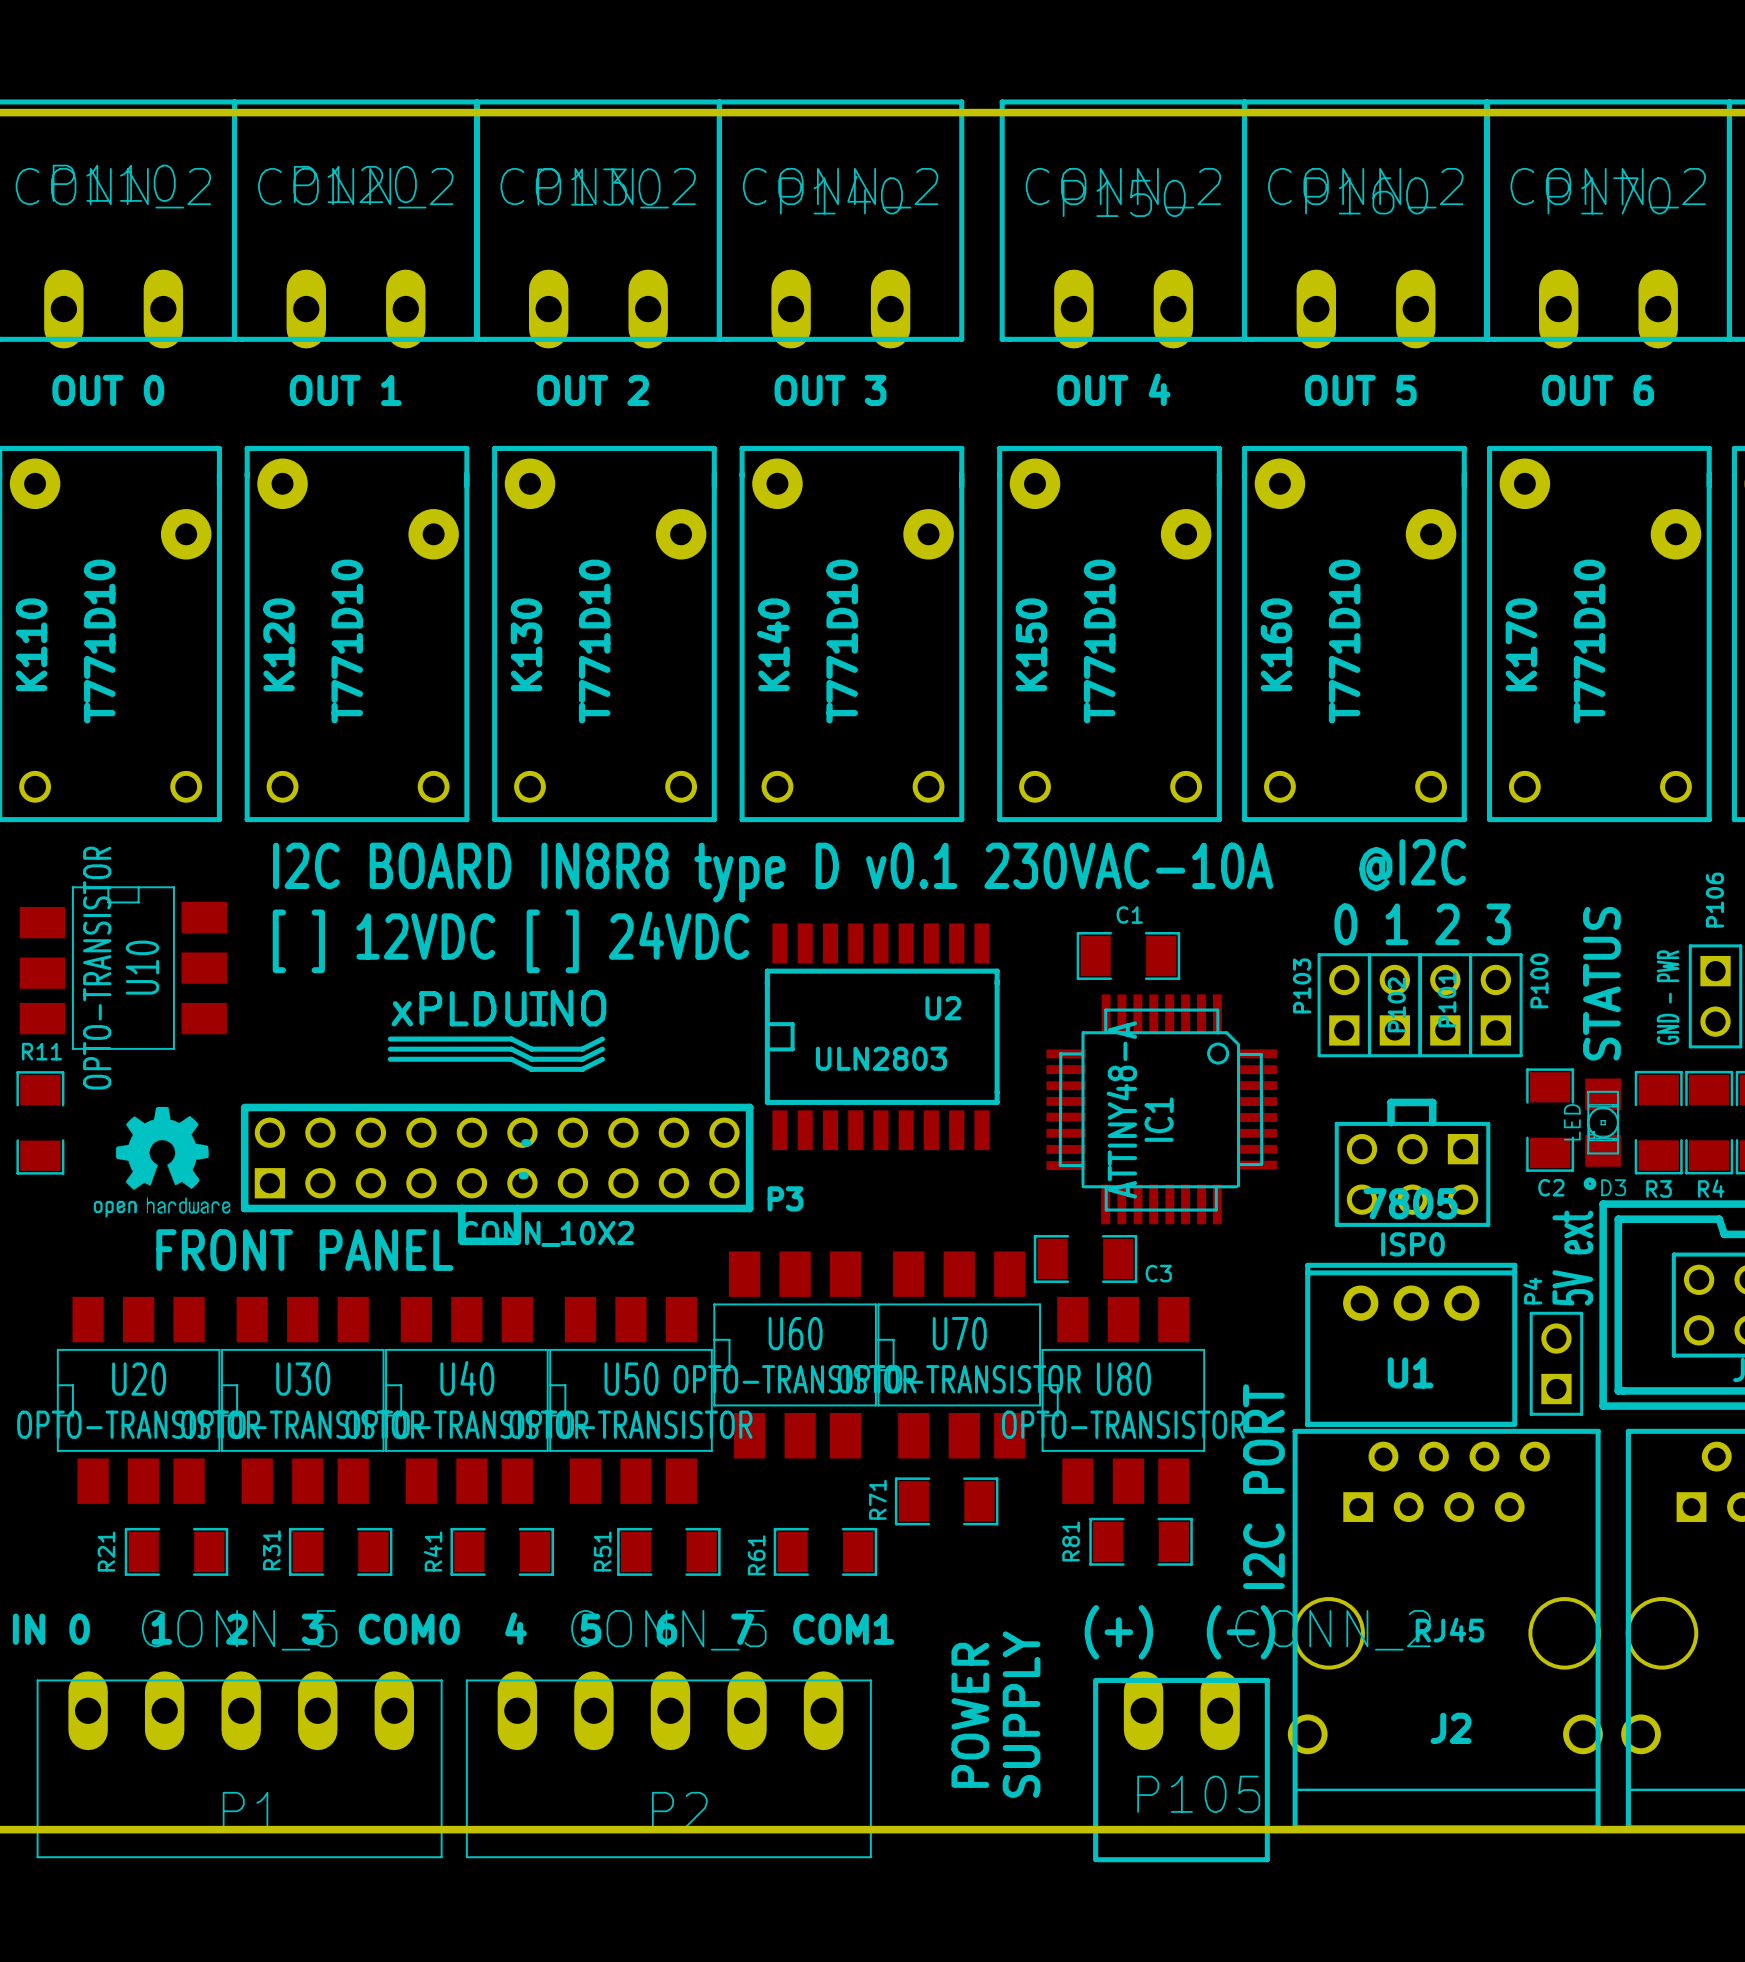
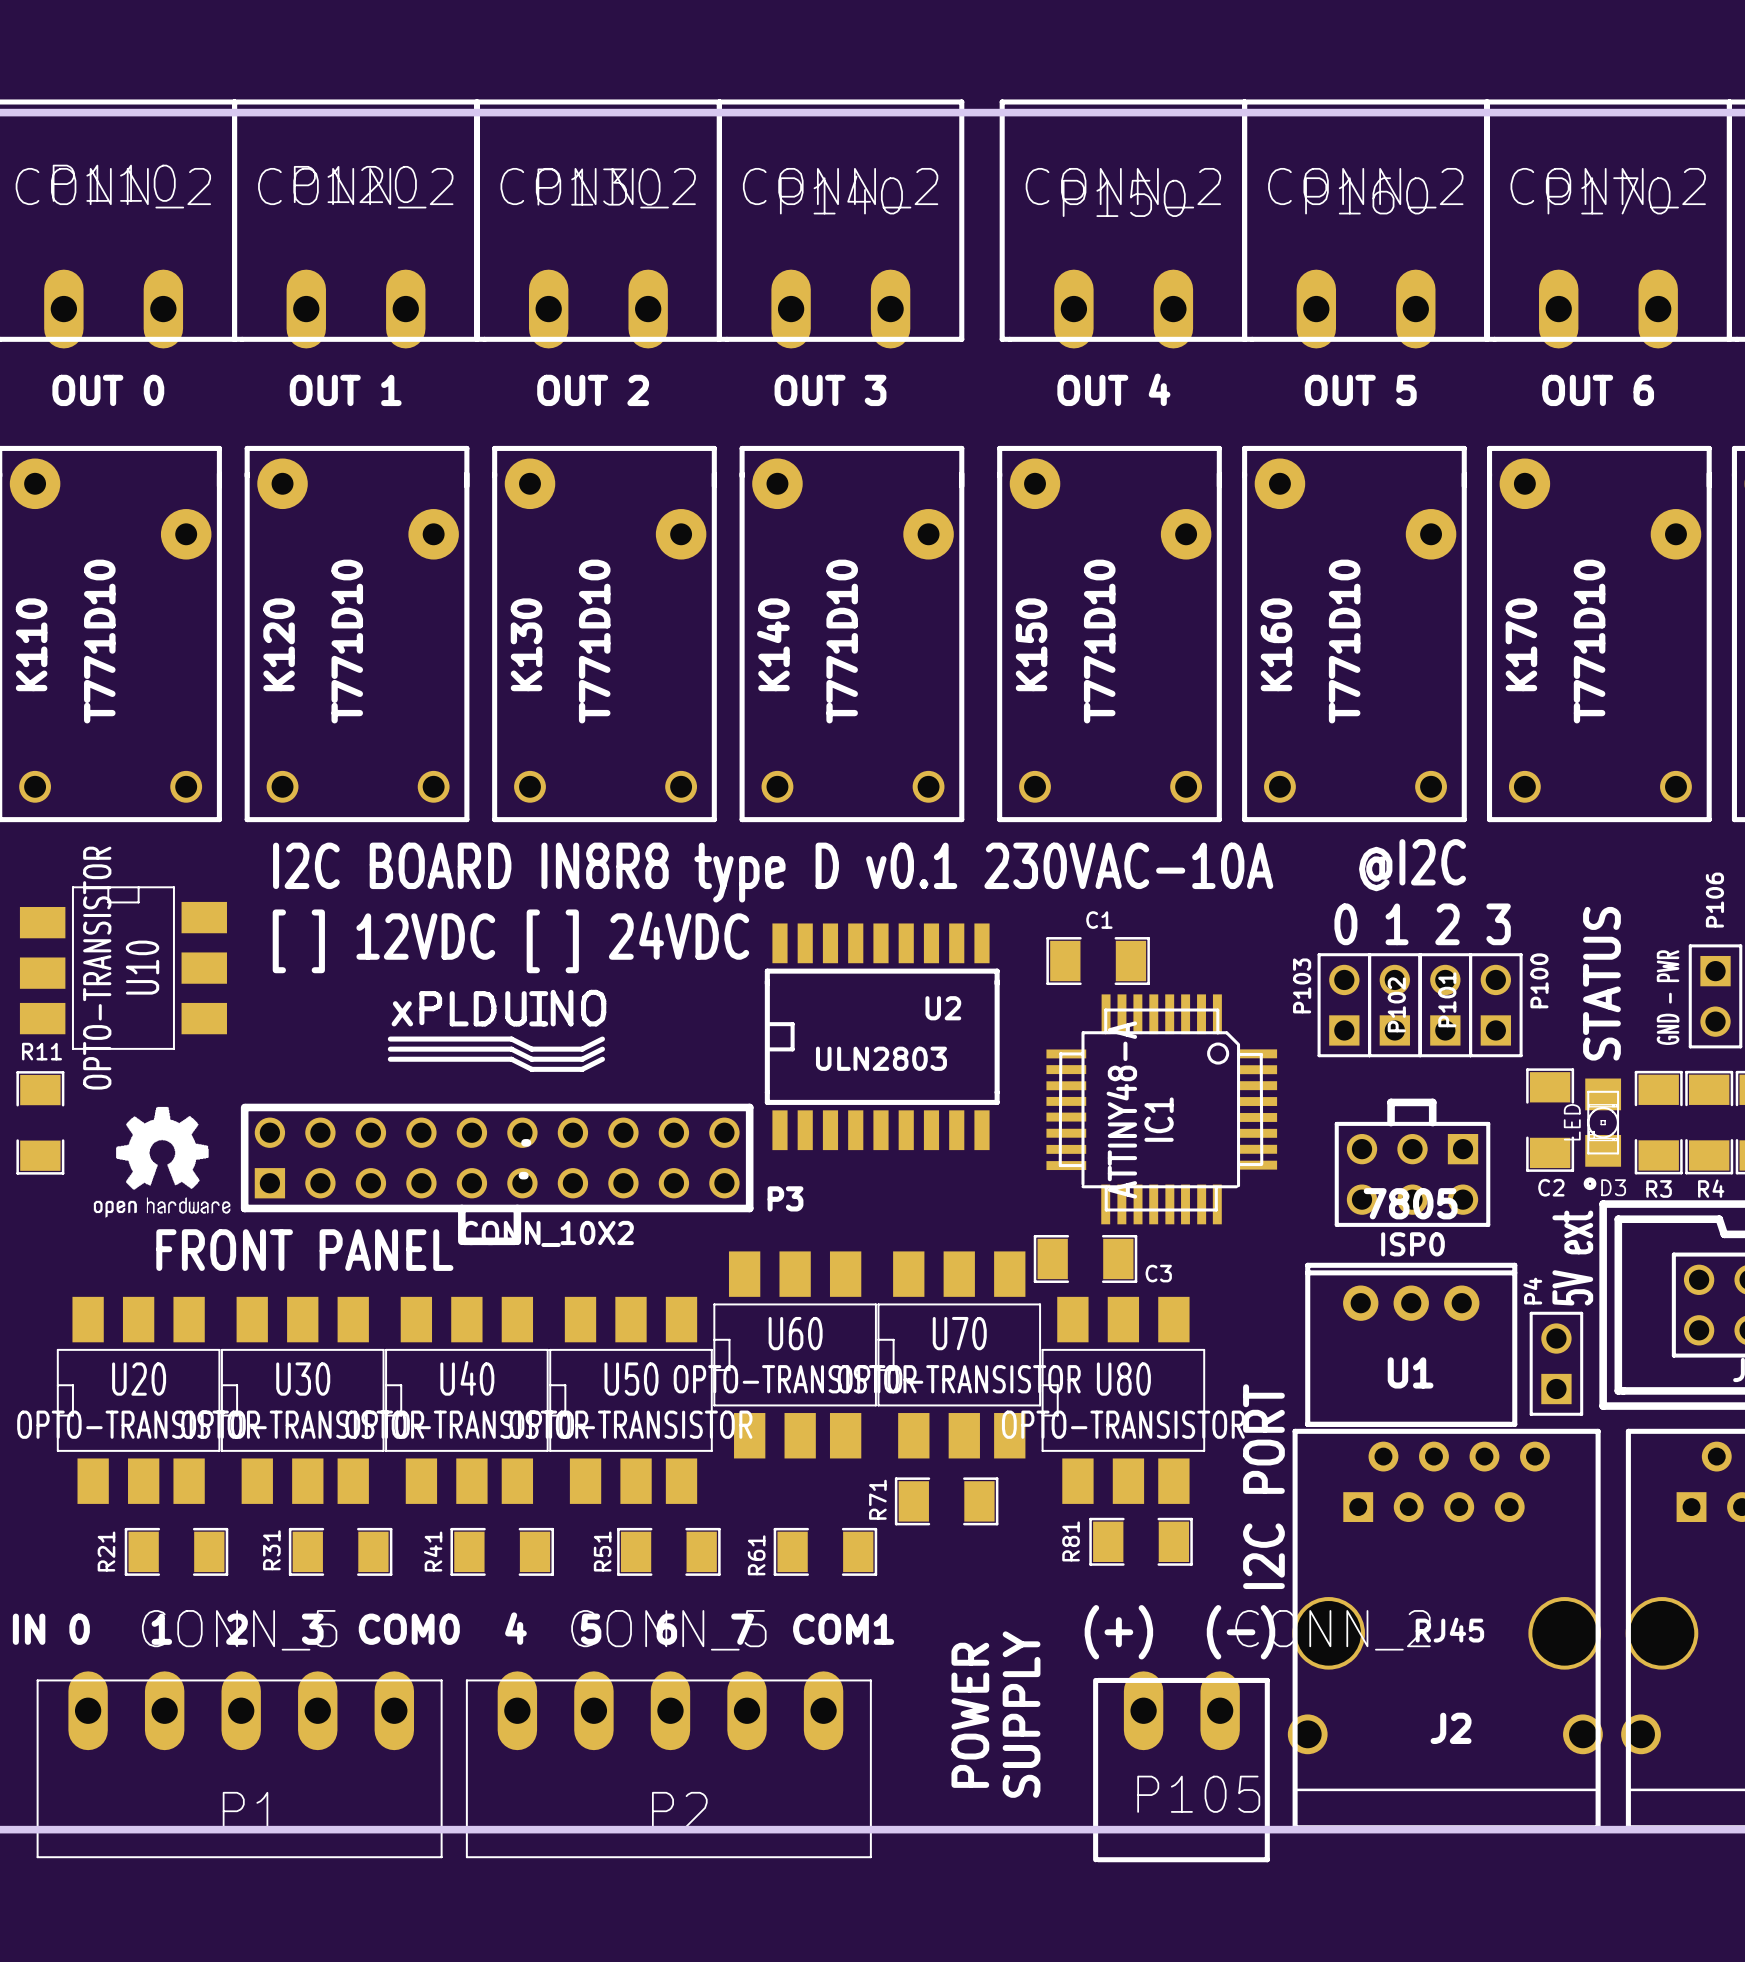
C1 position: (1128, 955) -> (1098, 961)

